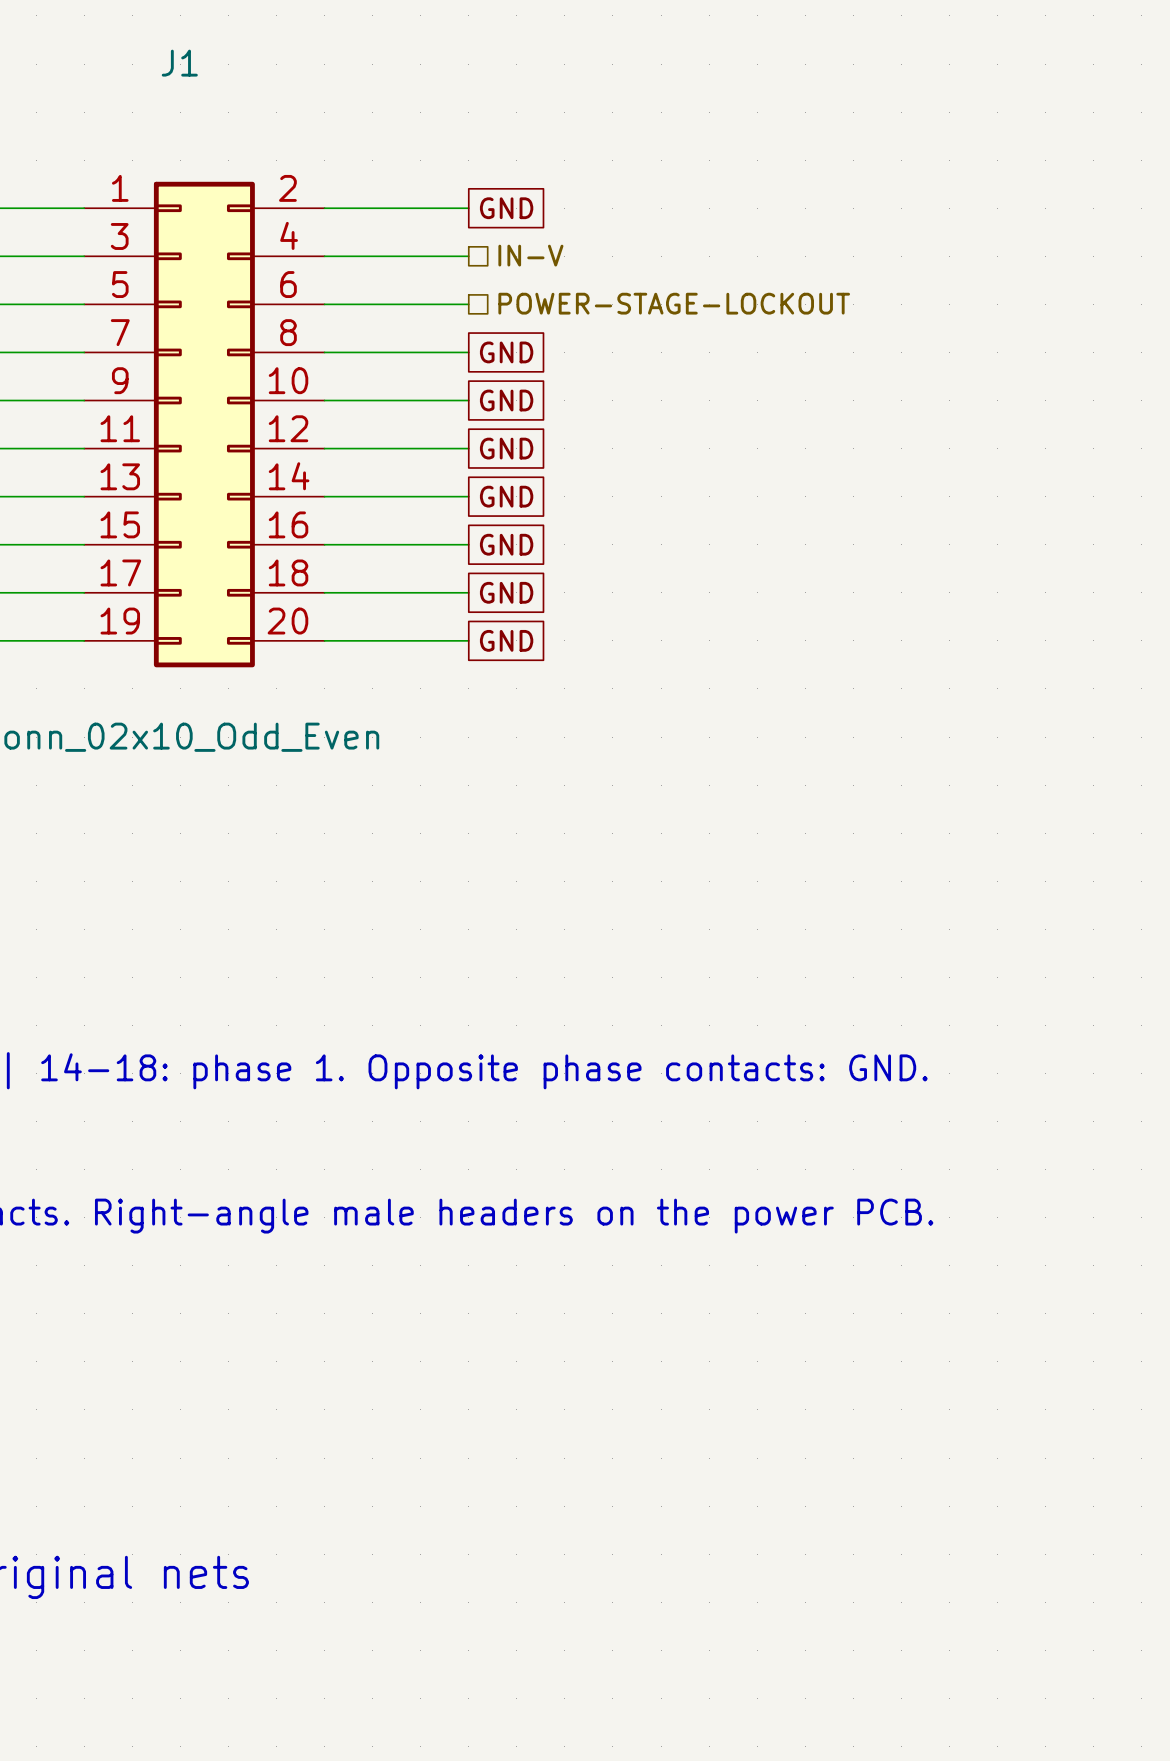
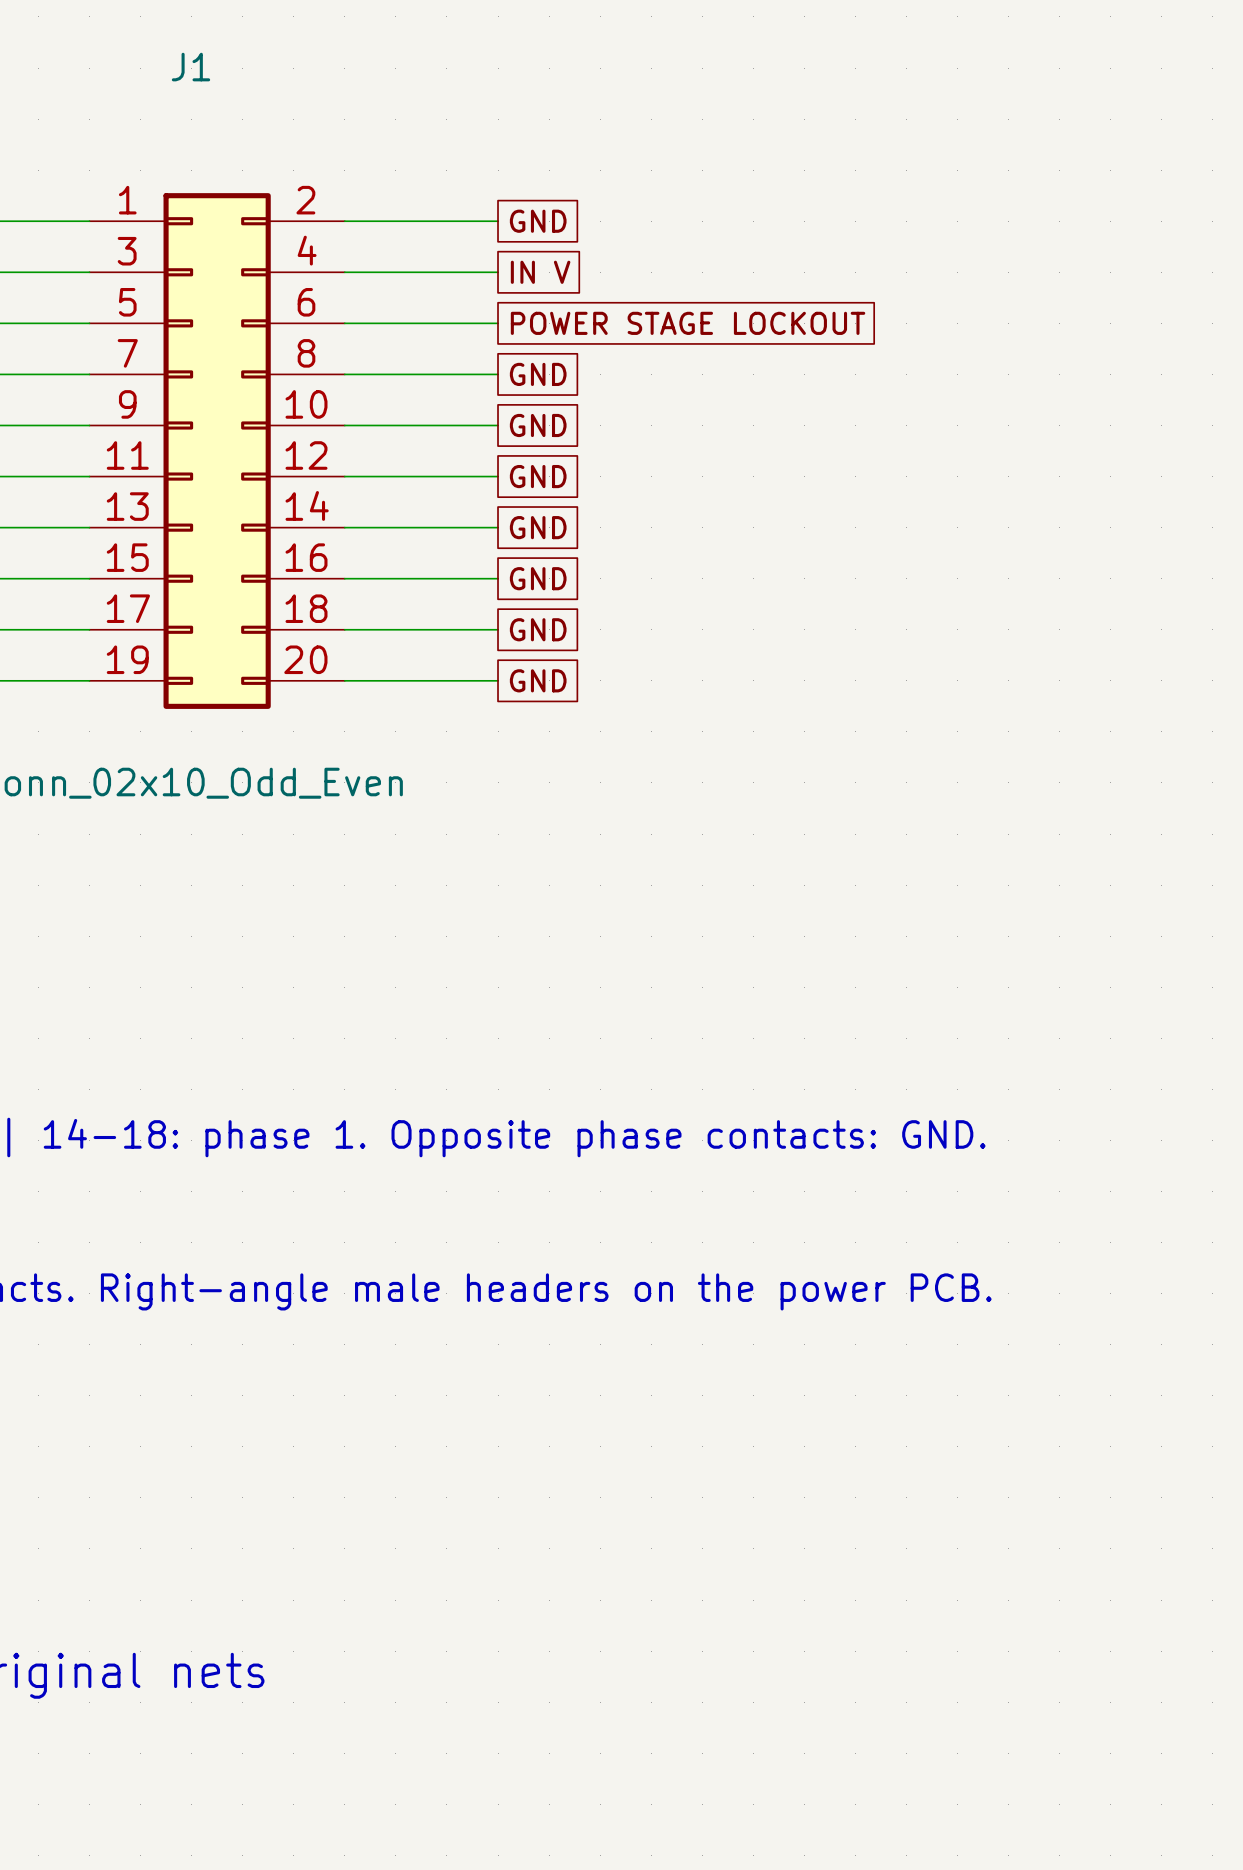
hierarchical label: IN-V (530, 255) -> none
global label: none -> IN V (540, 272)
hierarchical label: POWER-STAGE-LOCKOUT (674, 303) -> none
global label: none -> POWER STAGE LOCKOUT (688, 323)

